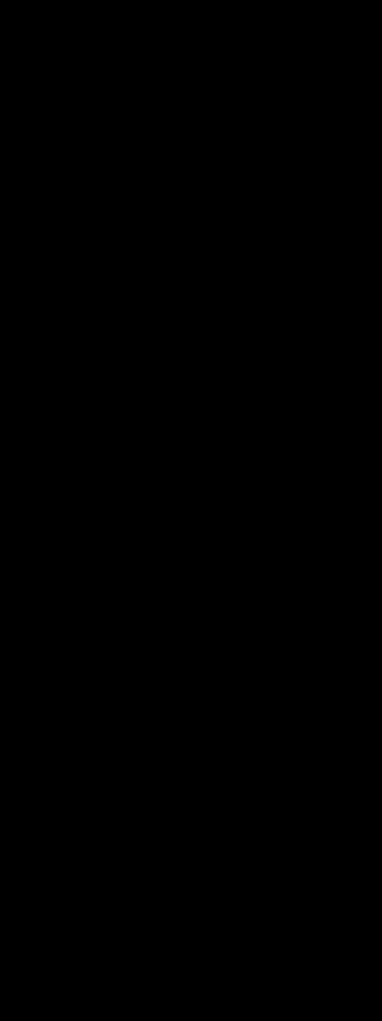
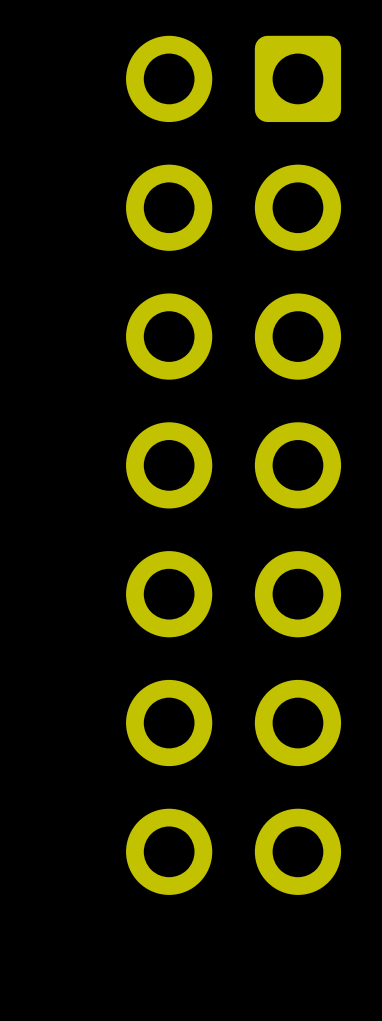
part: none -> (233, 465)

